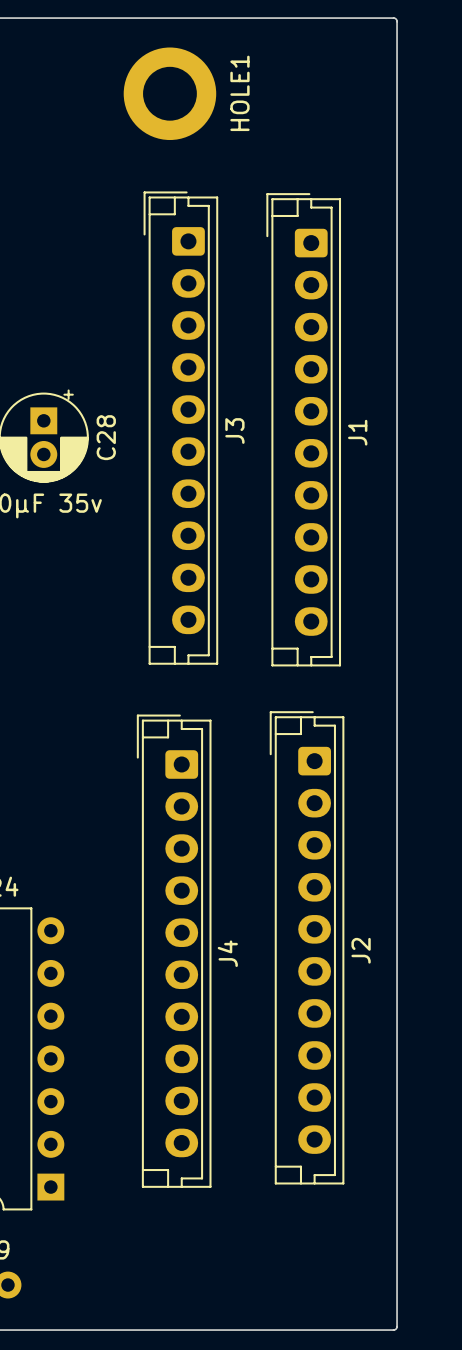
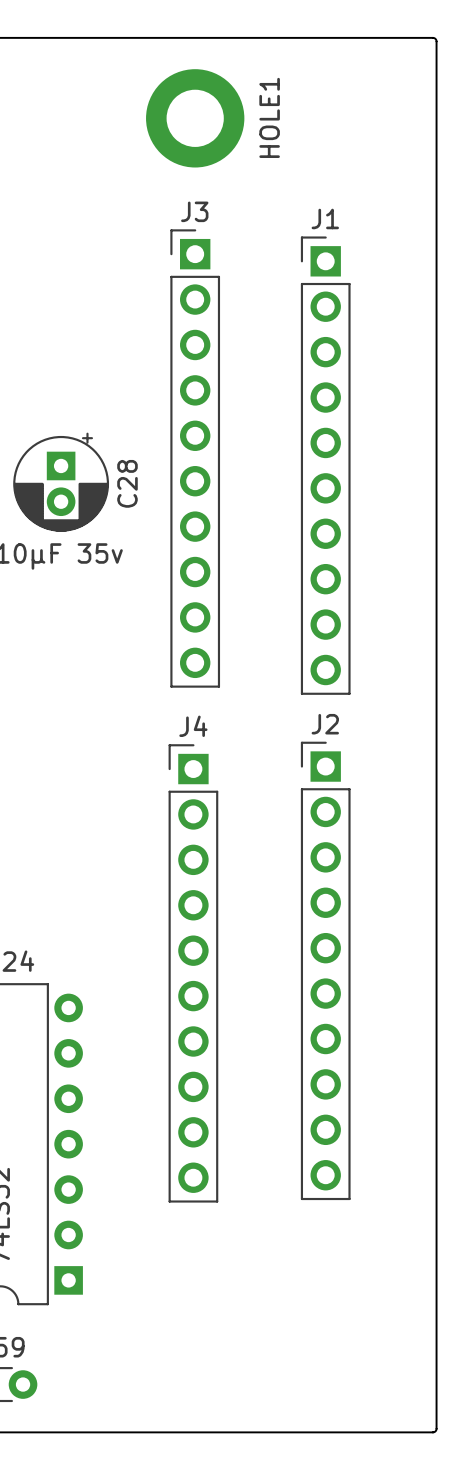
J3 footprint: [143, 191, 219, 665] -> [170, 229, 221, 688]
J1 footprint: [266, 193, 342, 667] -> [300, 236, 351, 695]
J3 name position: J3 (234, 431) -> J3 (194, 211)
J1 name position: J1 (357, 432) -> J1 (325, 218)
J2 footprint: [269, 711, 345, 1185] -> [300, 741, 351, 1201]
J4 footprint: [136, 714, 212, 1188] -> [168, 744, 219, 1203]
J2 name position: J2 (361, 950) -> J2 (325, 724)
J4 name position: J4 (227, 953) -> J4 (193, 726)

